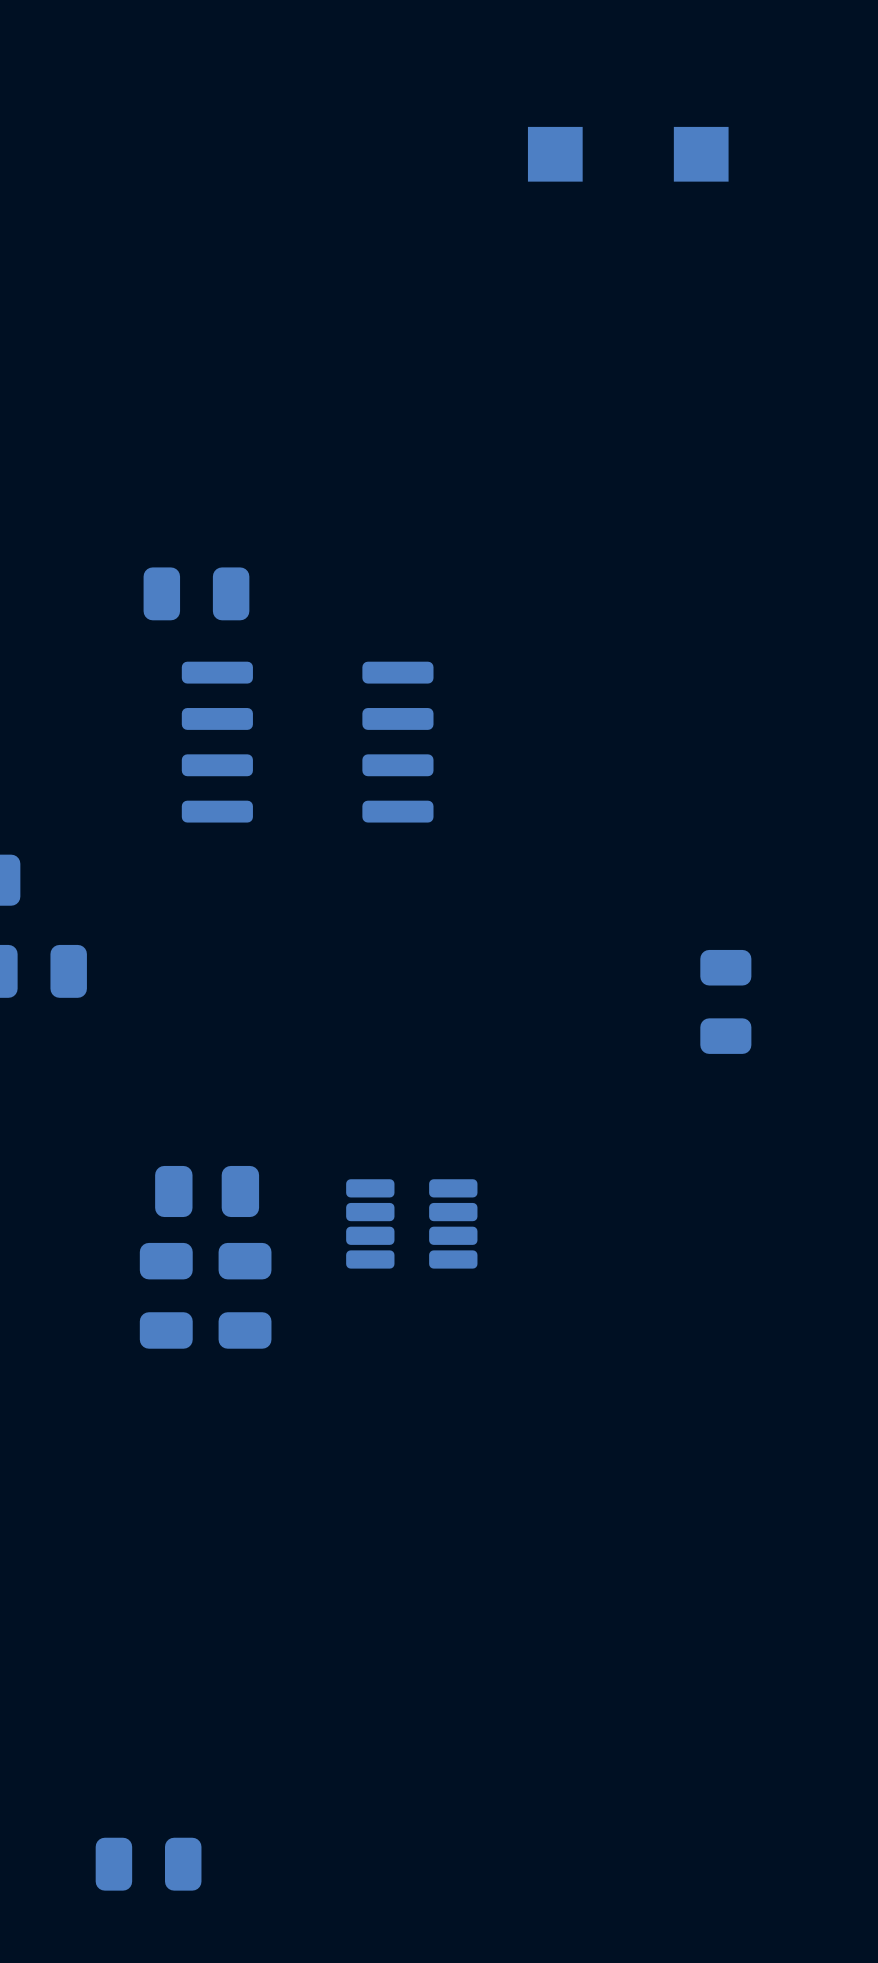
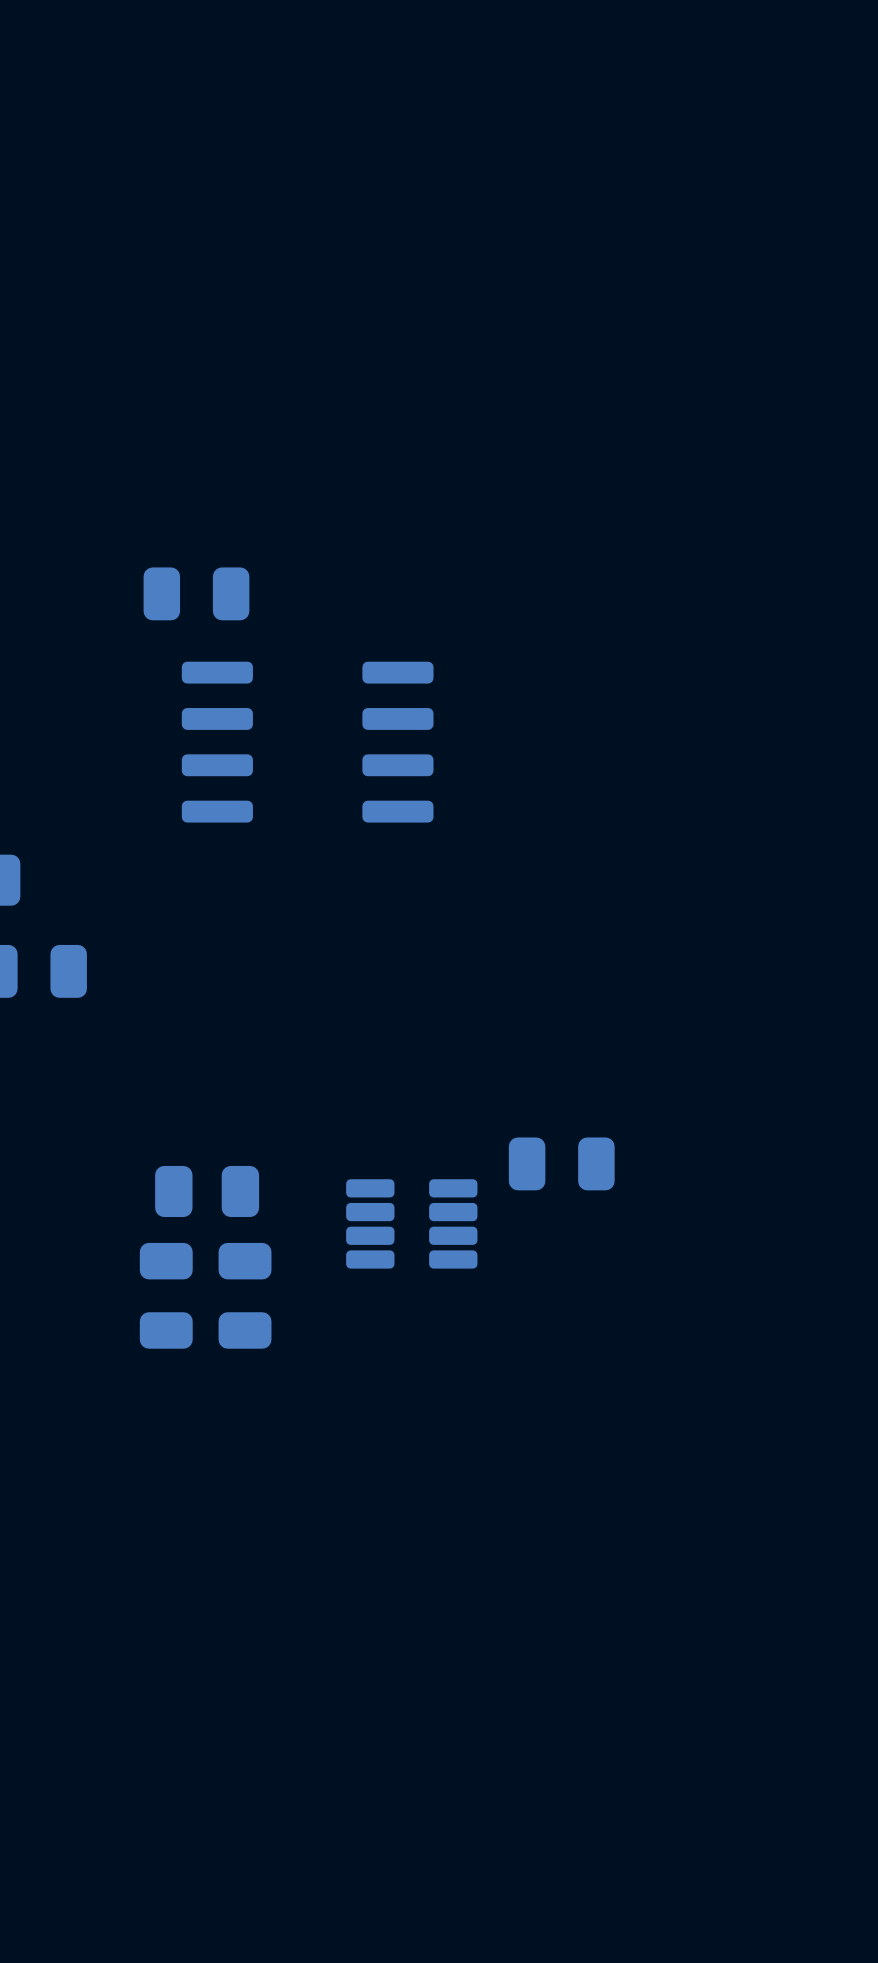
part: (555, 154) -> none
part: (701, 154) -> none
part: (725, 1001) -> none
part position: (148, 1864) -> (561, 1163)

